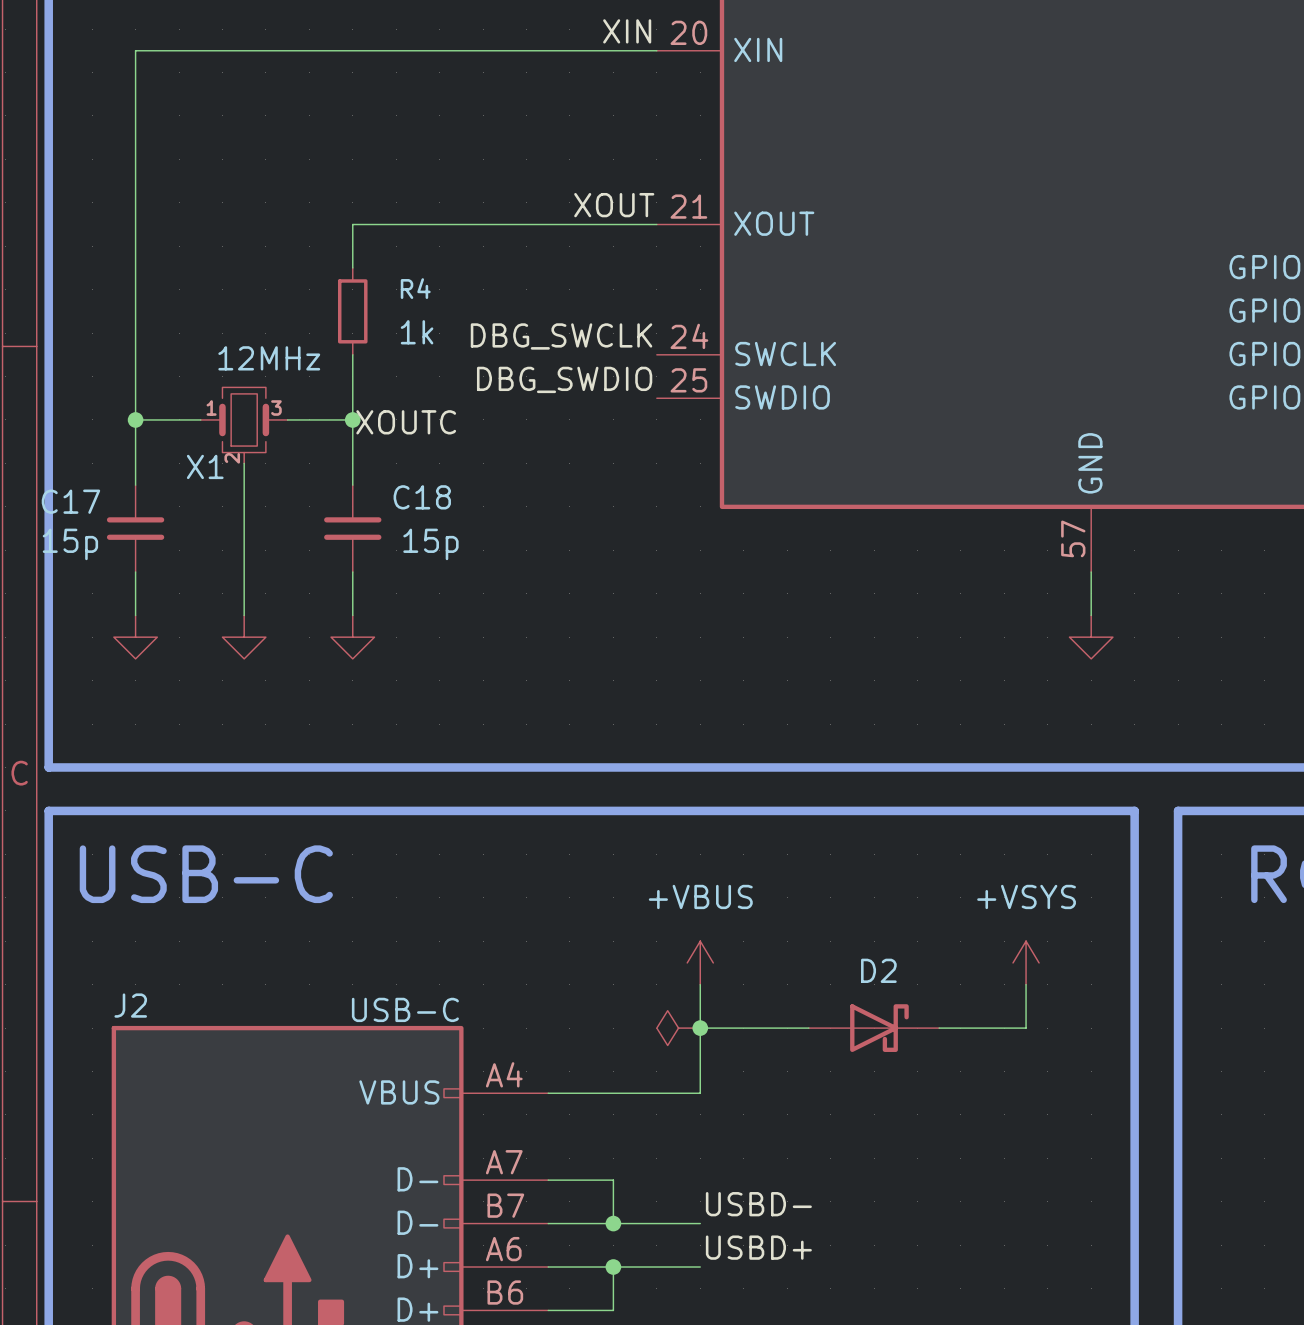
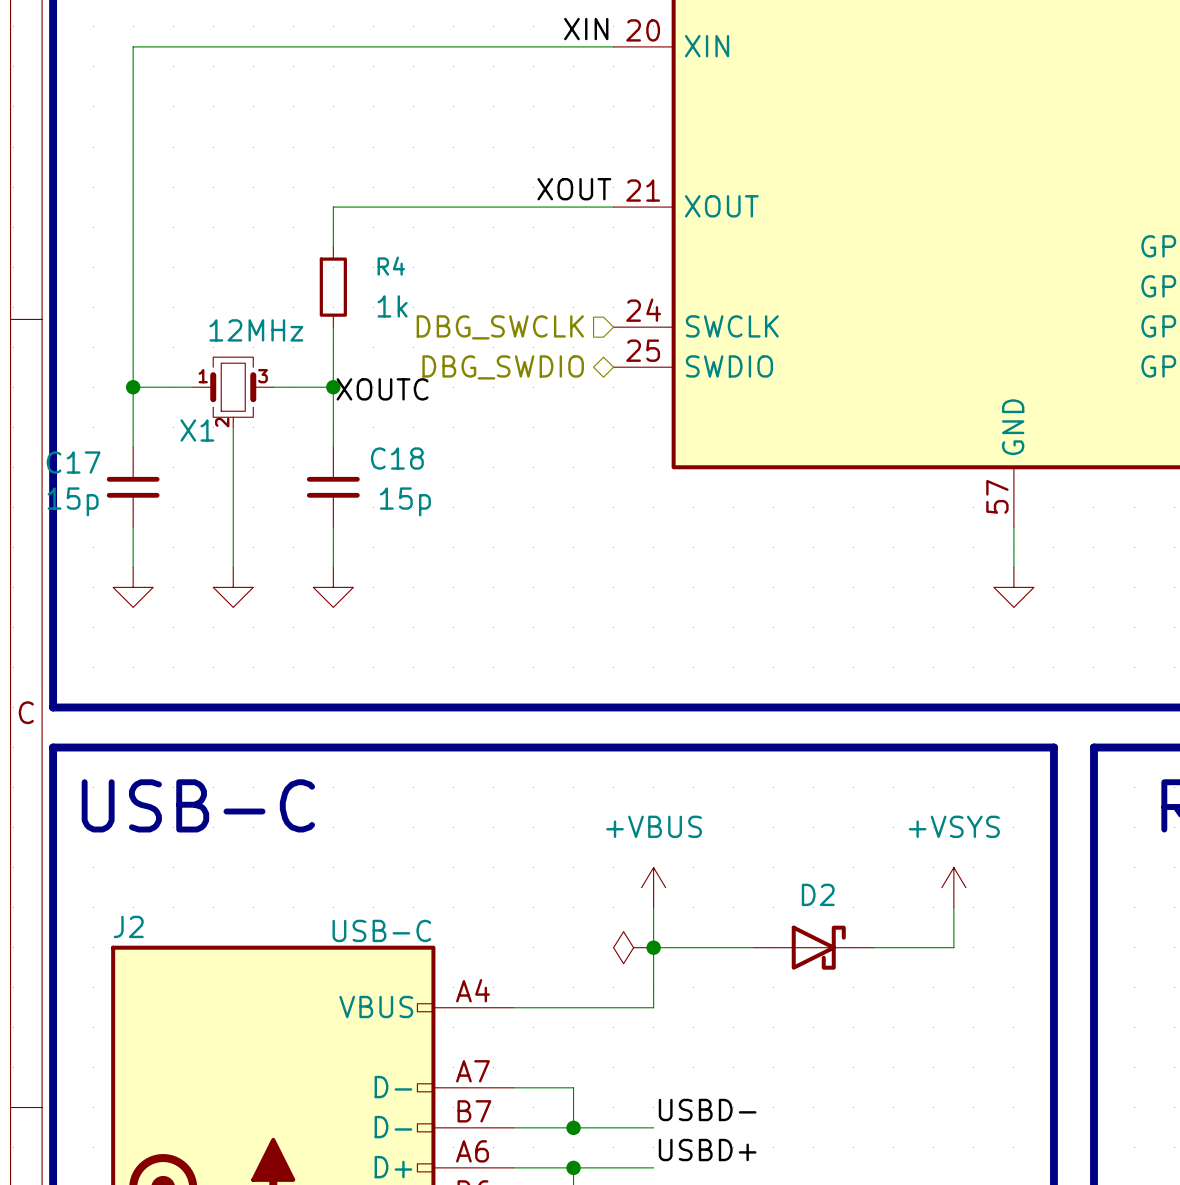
label: DBG_SWCLK (561, 336) -> none
hierarchical label: none -> DBG_SWCLK (500, 327)
label: DBG_SWDIO (564, 379) -> none
hierarchical label: none -> DBG_SWDIO (503, 367)

